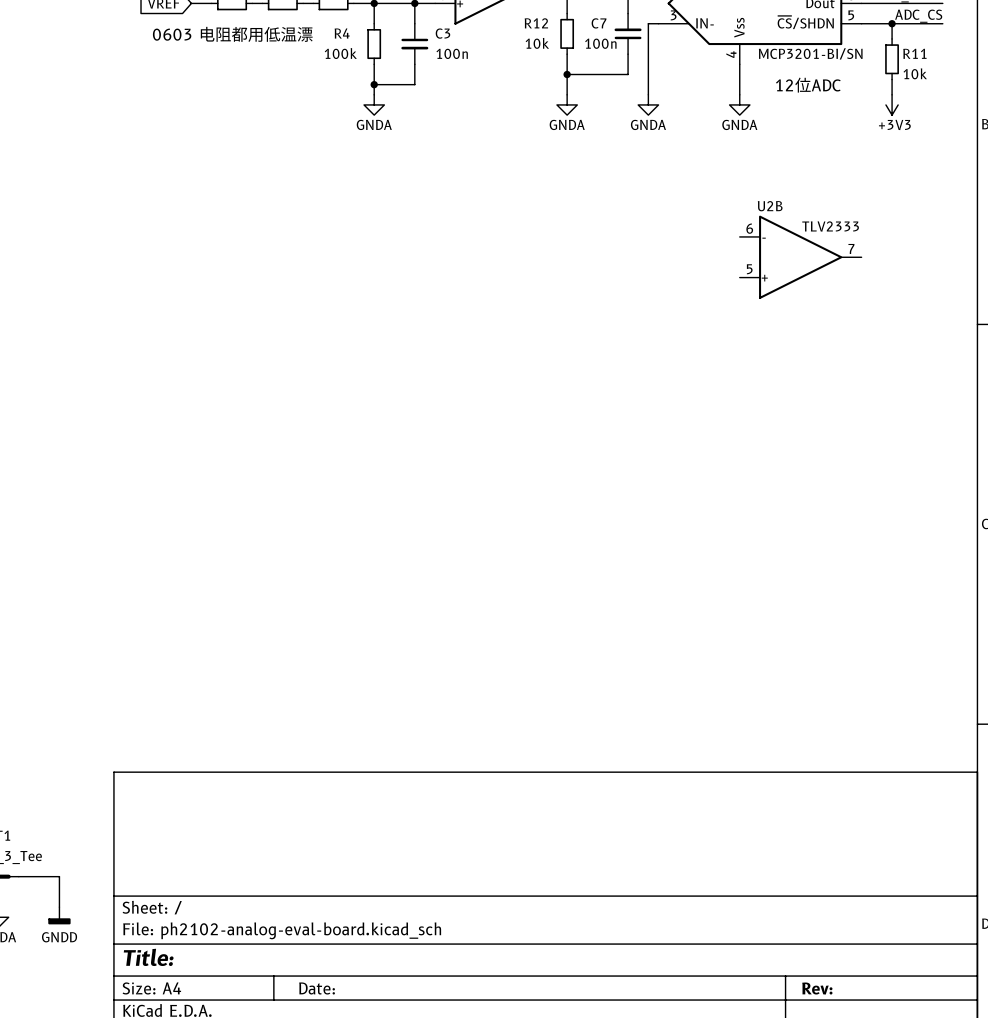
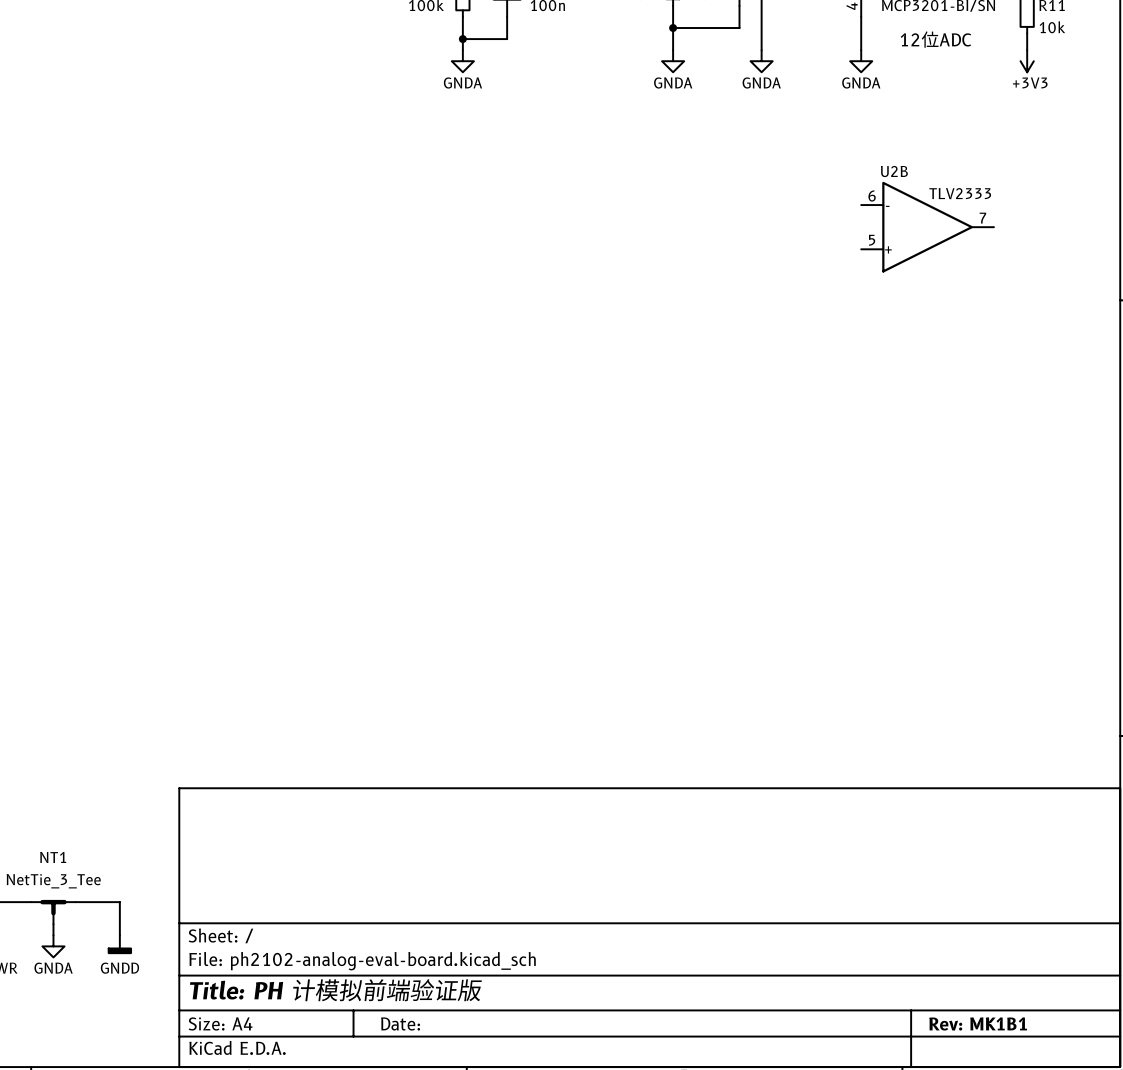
title block: Title: (148, 957) -> Title: PH 计模拟前端验证版 (335, 990)
title block: Rev: (817, 988) -> Rev: MK1B1 (978, 1023)

